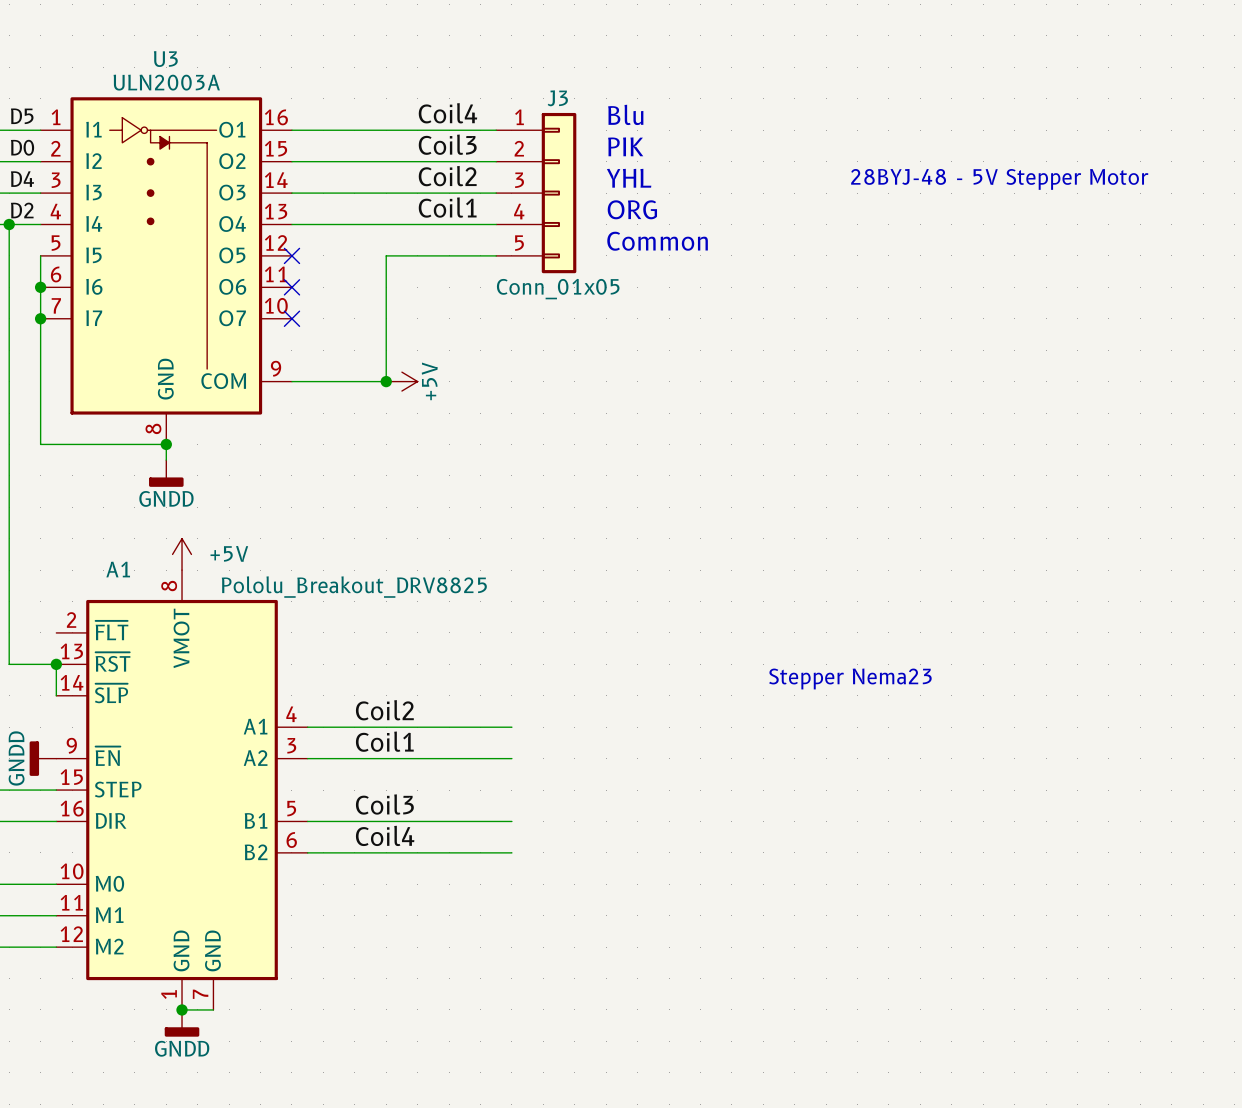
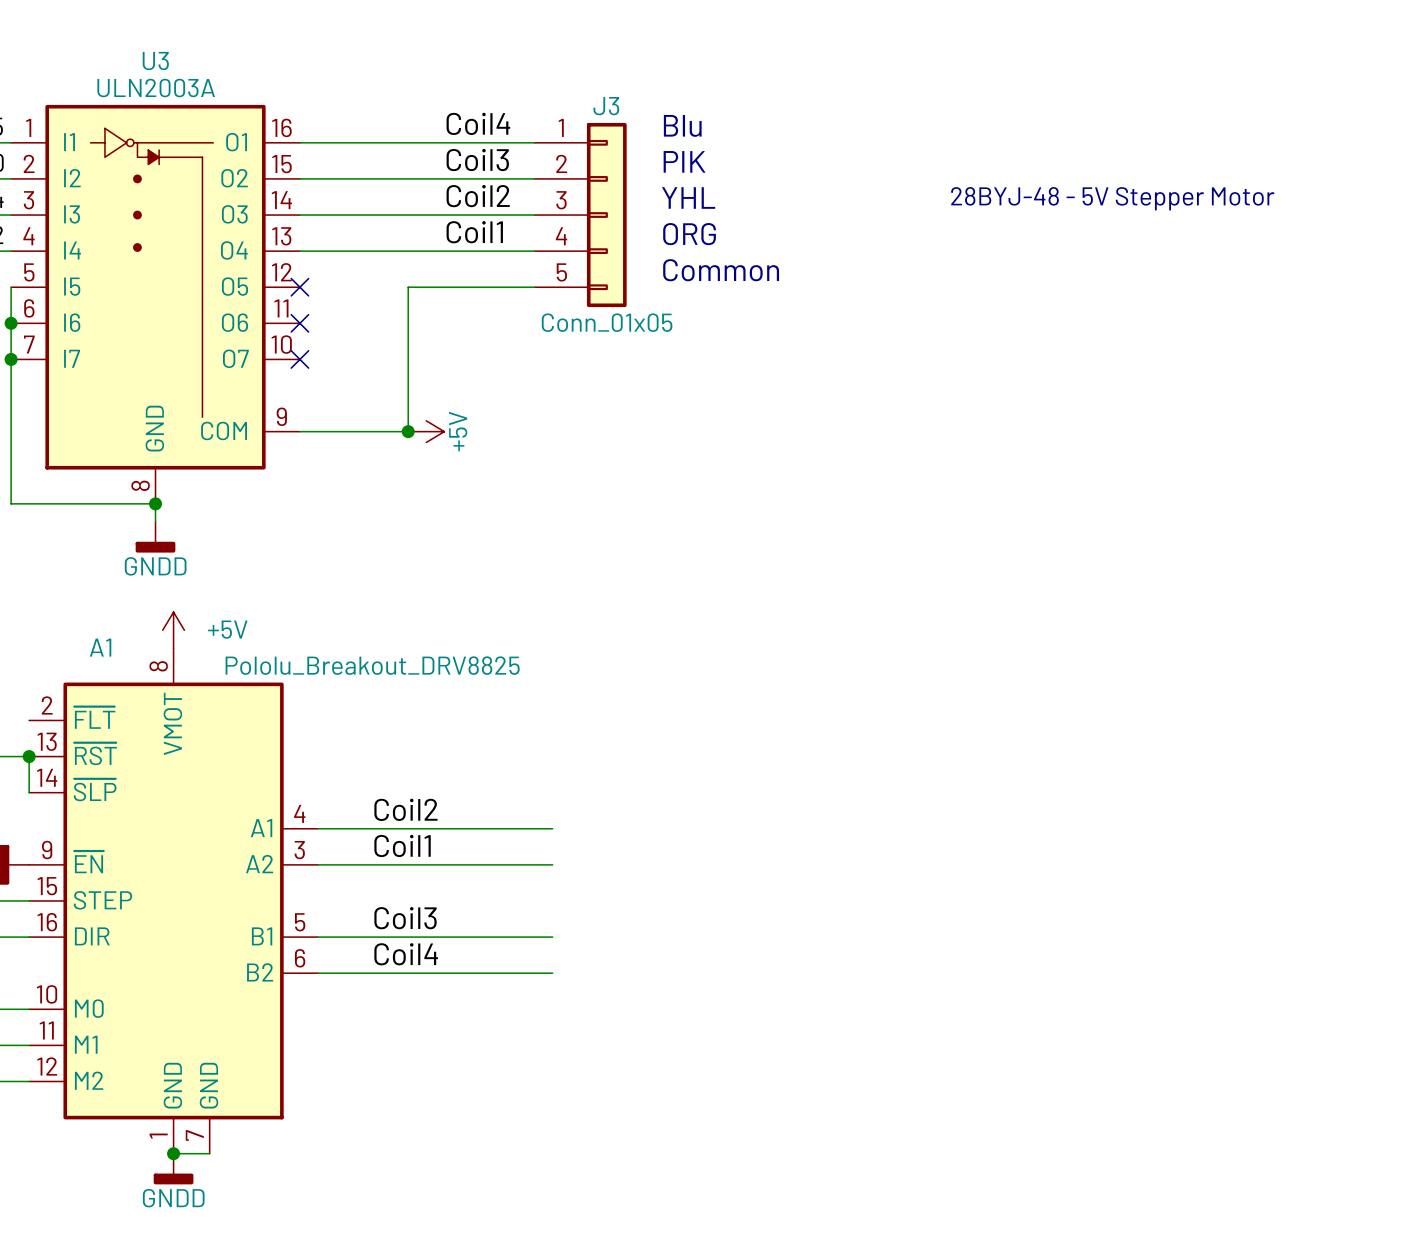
text: Stepper Nema23 (850, 678) -> none

